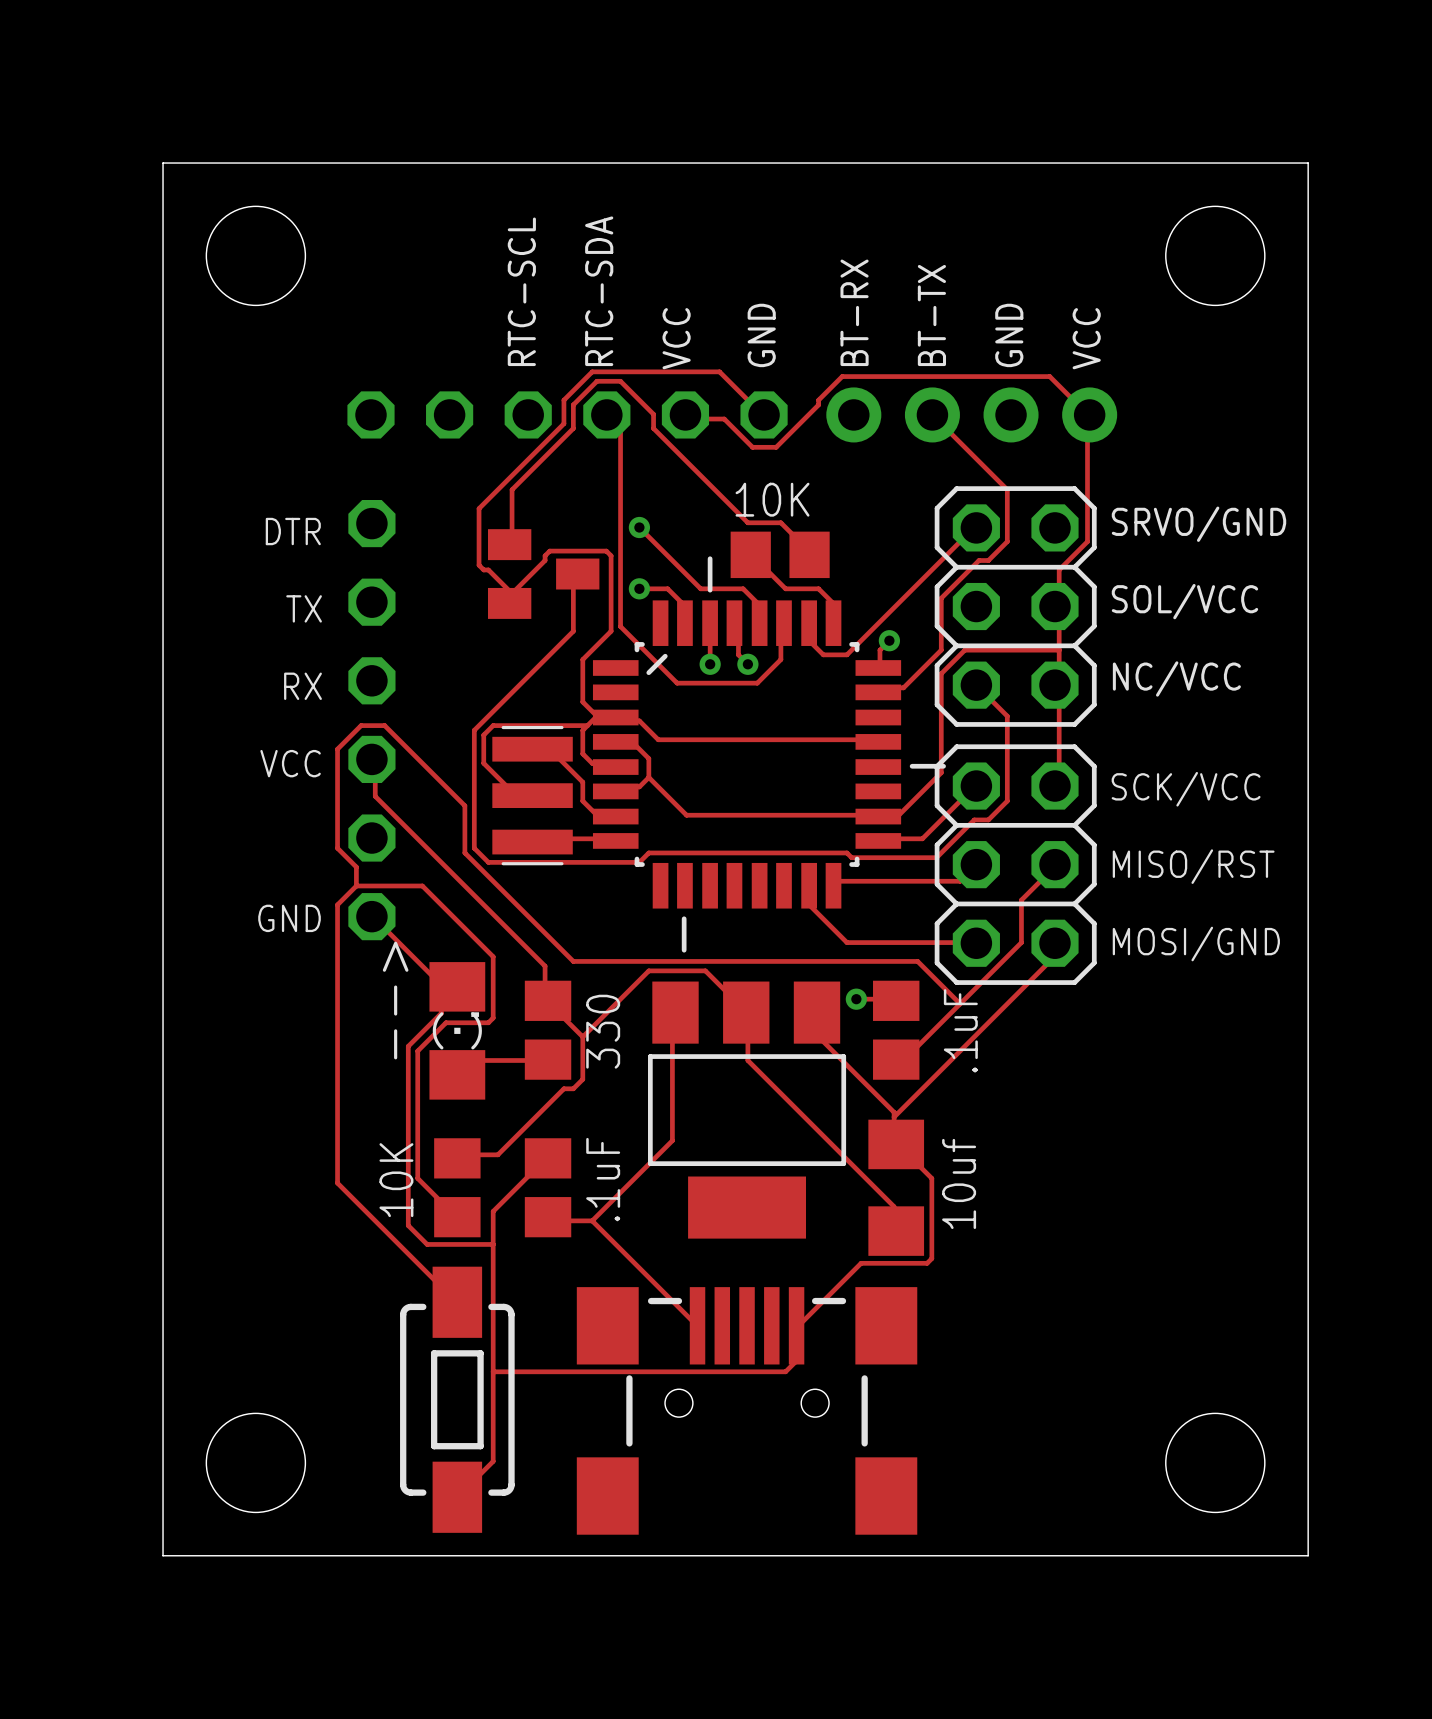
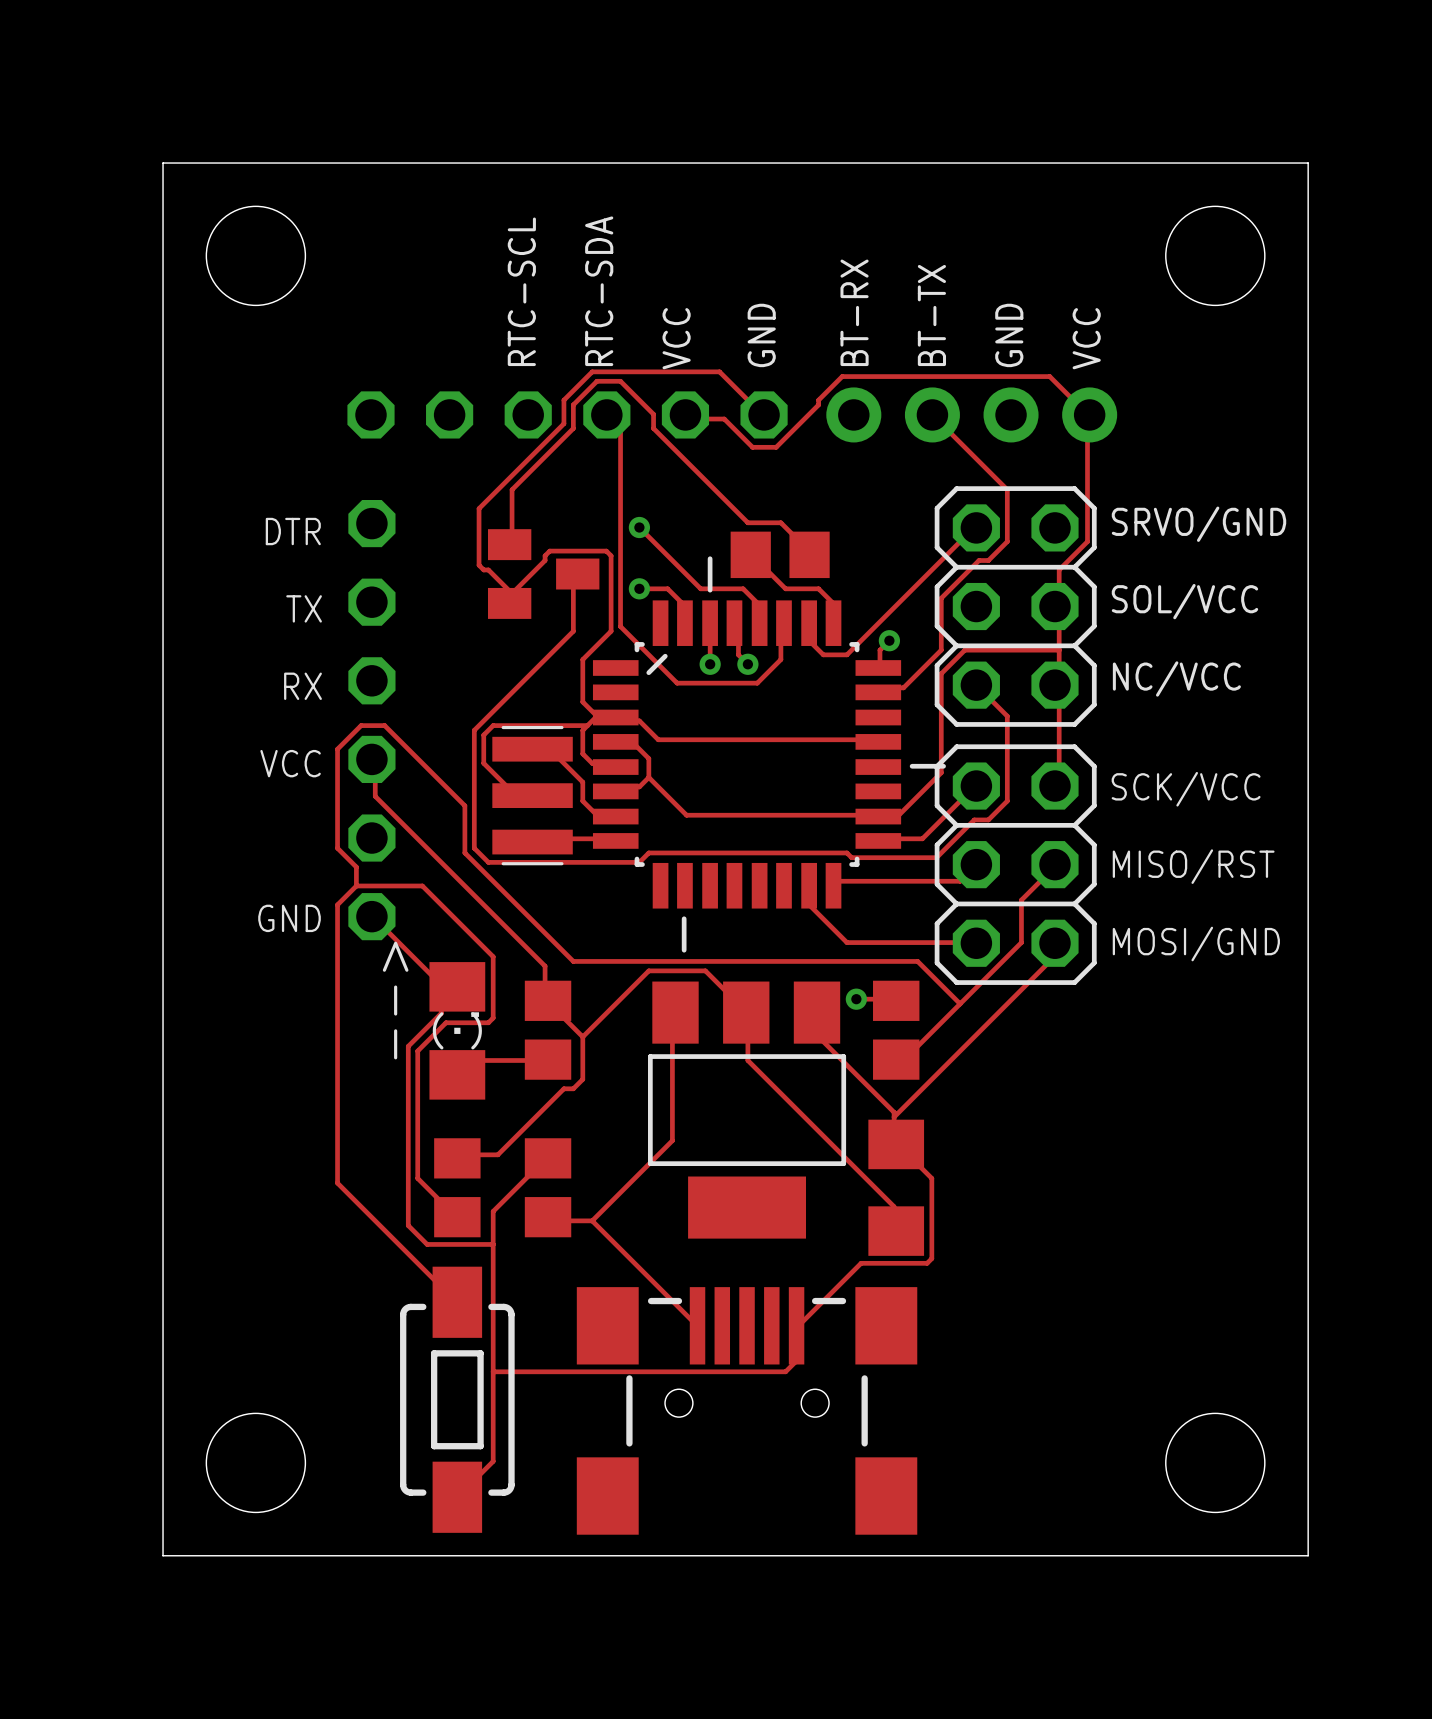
part value: 10K (772, 499) -> none
part value: .1uF (960, 1030) -> none
part value: 330 (603, 1031) -> none
part value: .1uF (603, 1179) -> none
part value: 10K (396, 1180) -> none
part value: 10uf (959, 1183) -> none

